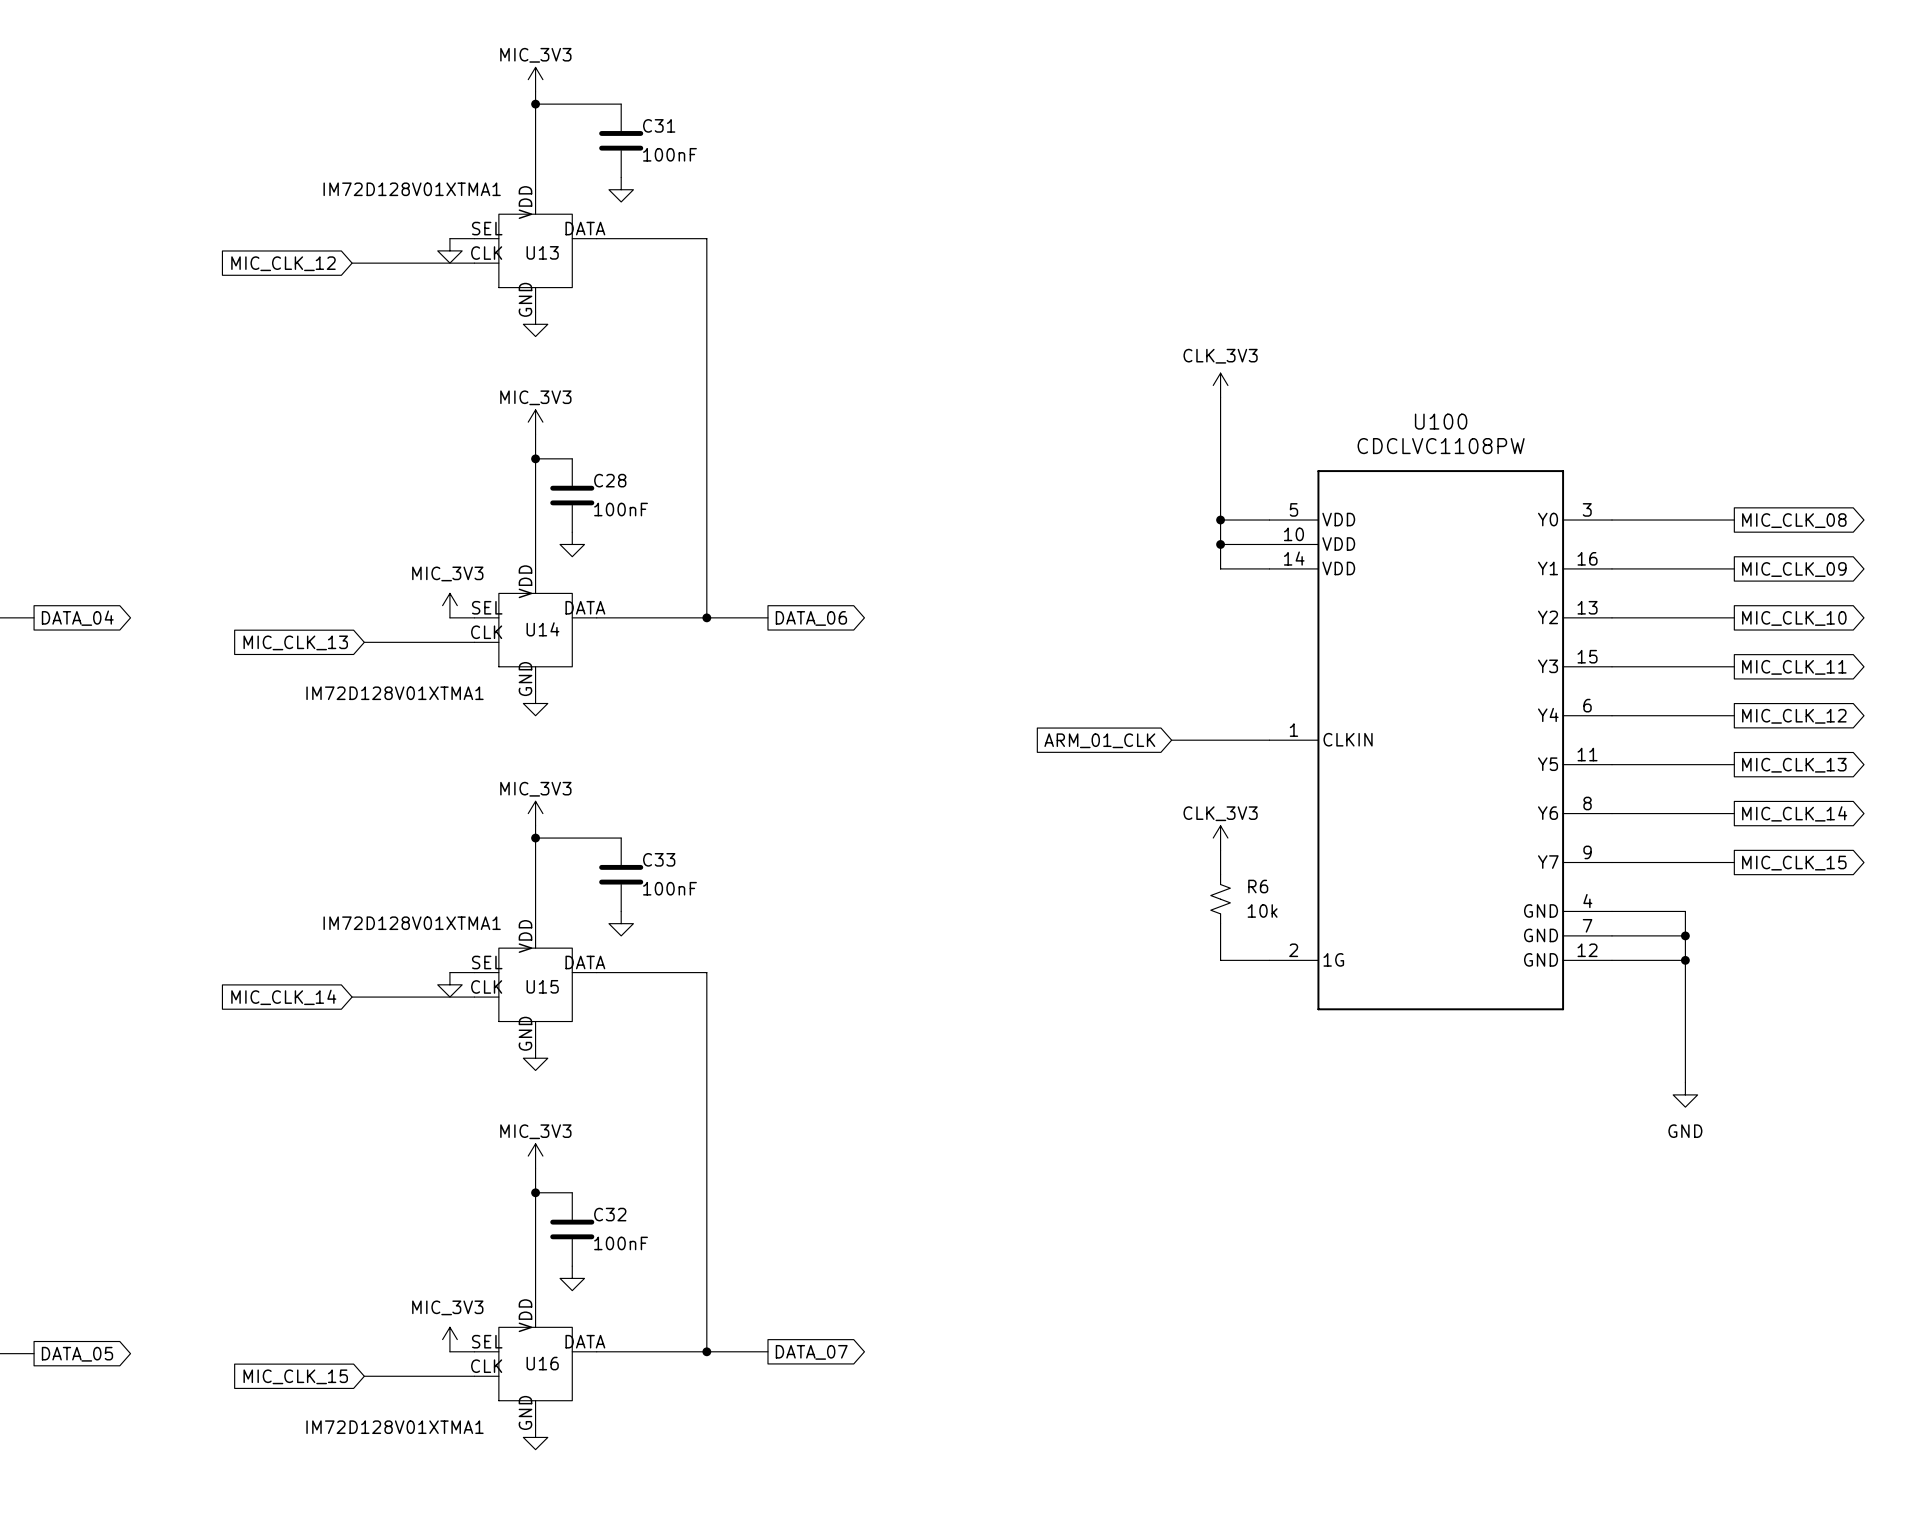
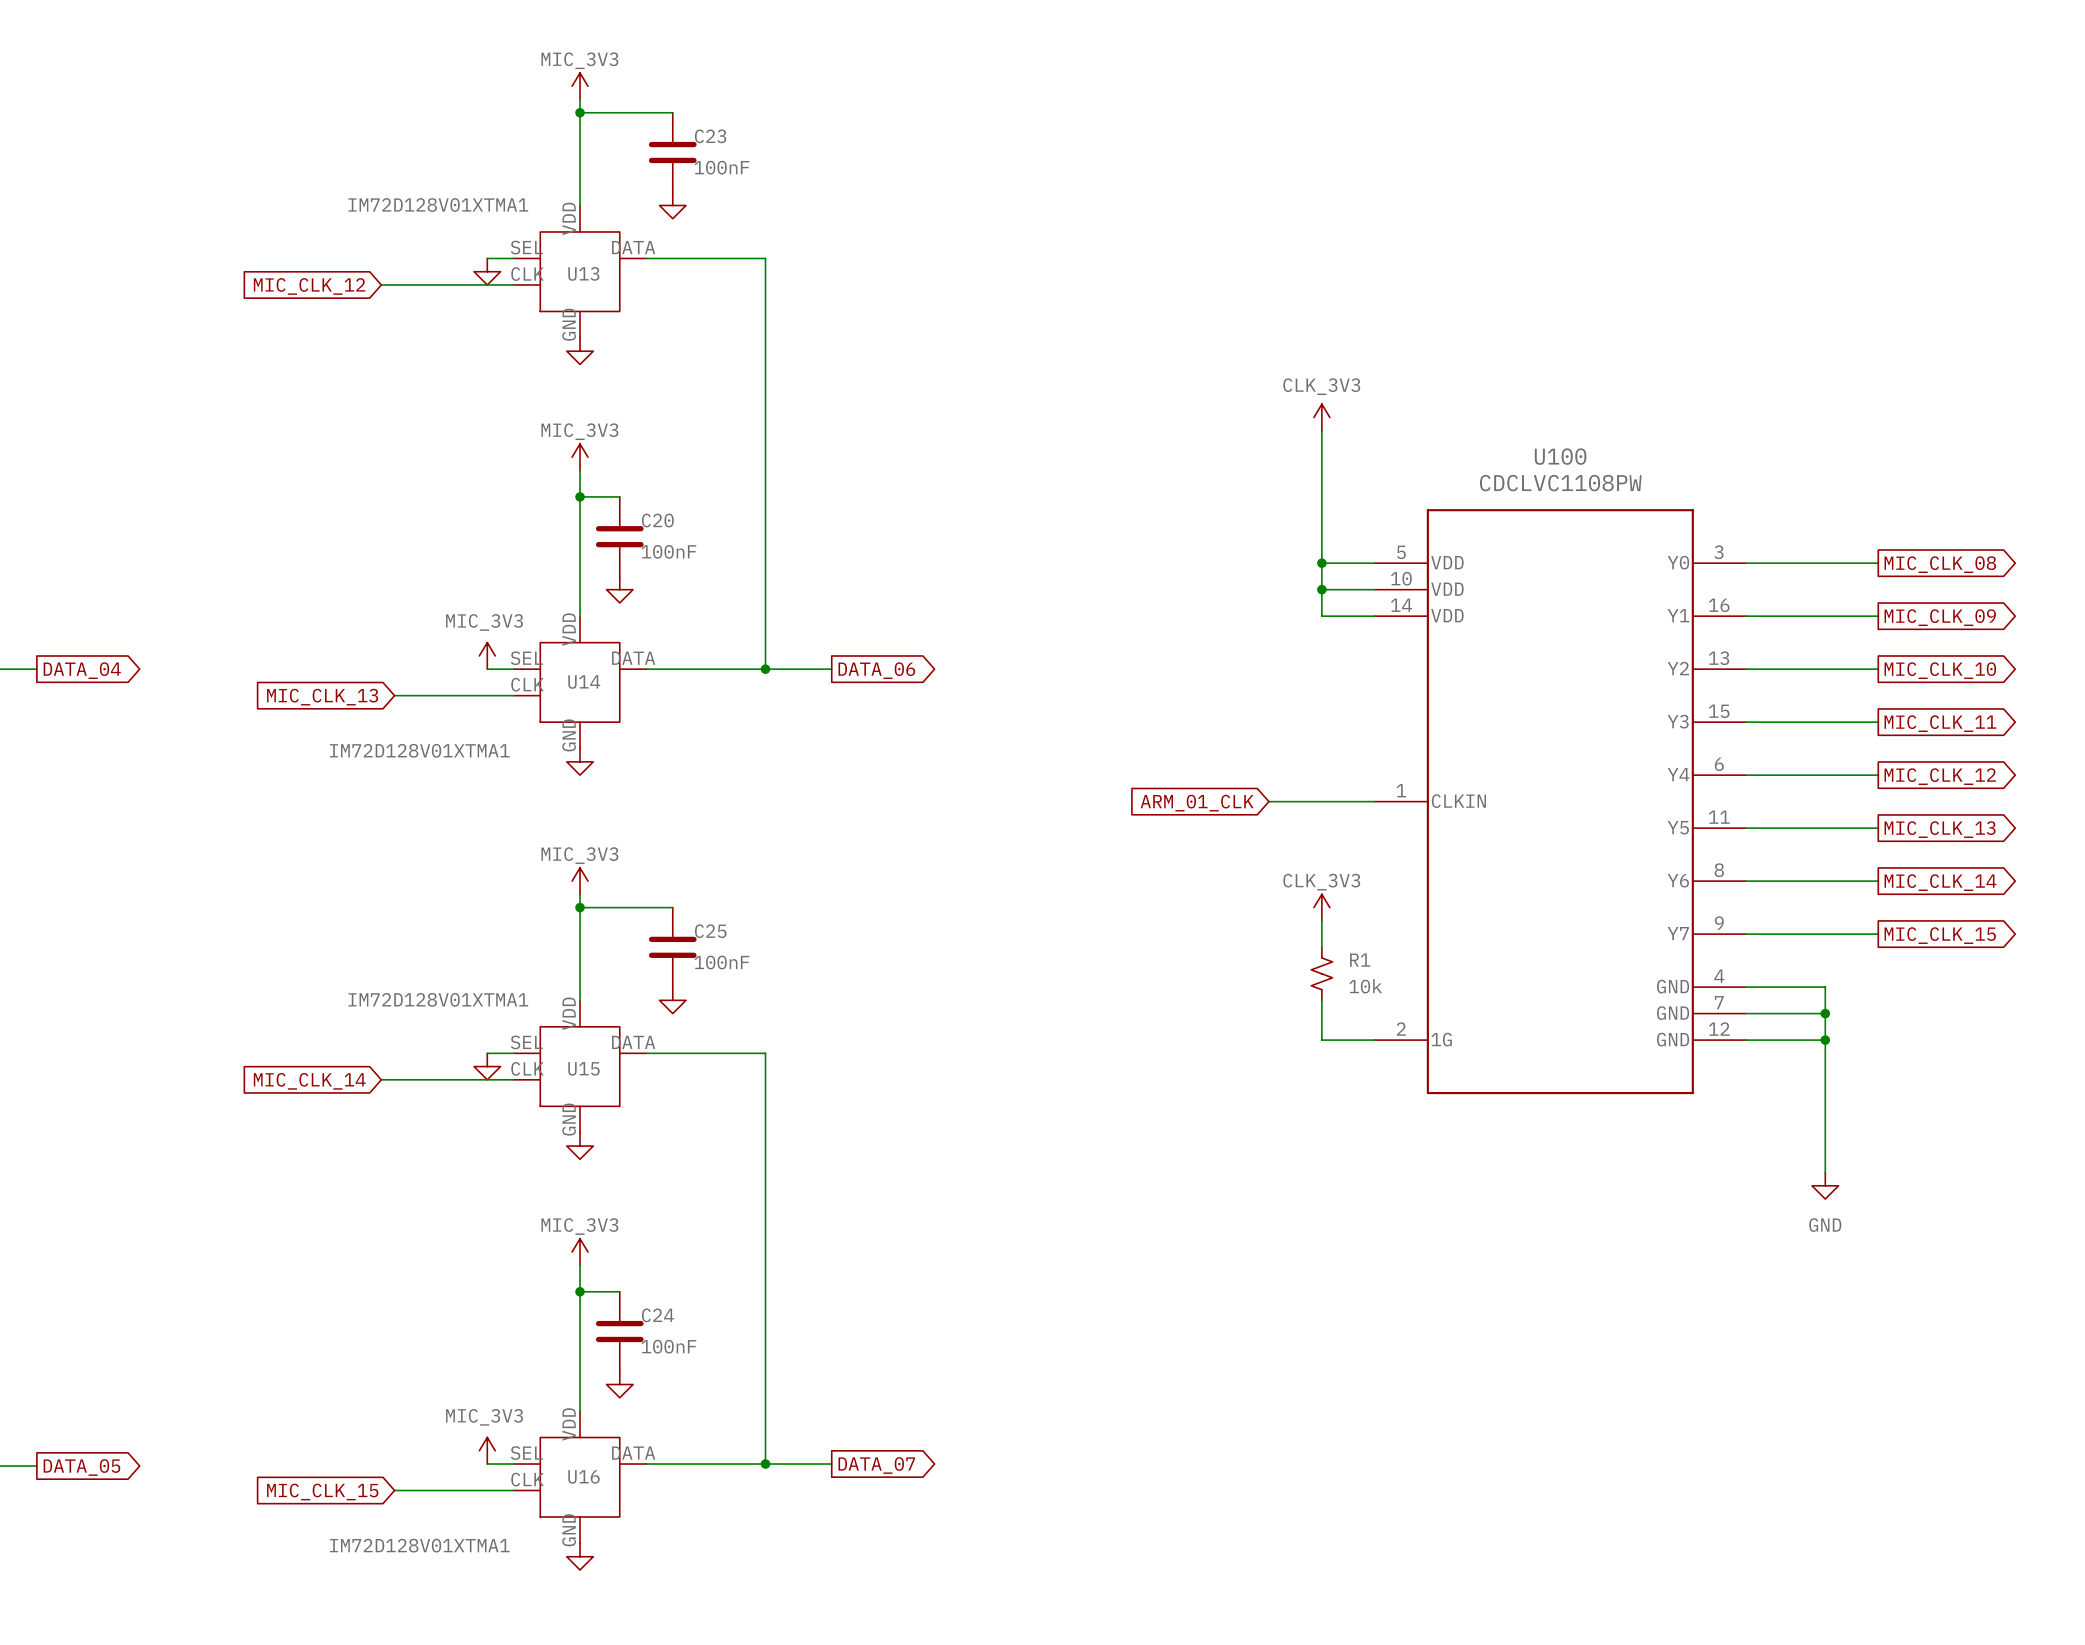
C31 name: C31 (659, 125) -> C23 (710, 136)
C28 name: C28 (610, 480) -> C20 (657, 520)
C33 name: C33 (659, 859) -> C25 (710, 931)
R6 name: R6 (1258, 886) -> R1 (1360, 960)
C32 name: C32 (610, 1214) -> C24 (658, 1315)

